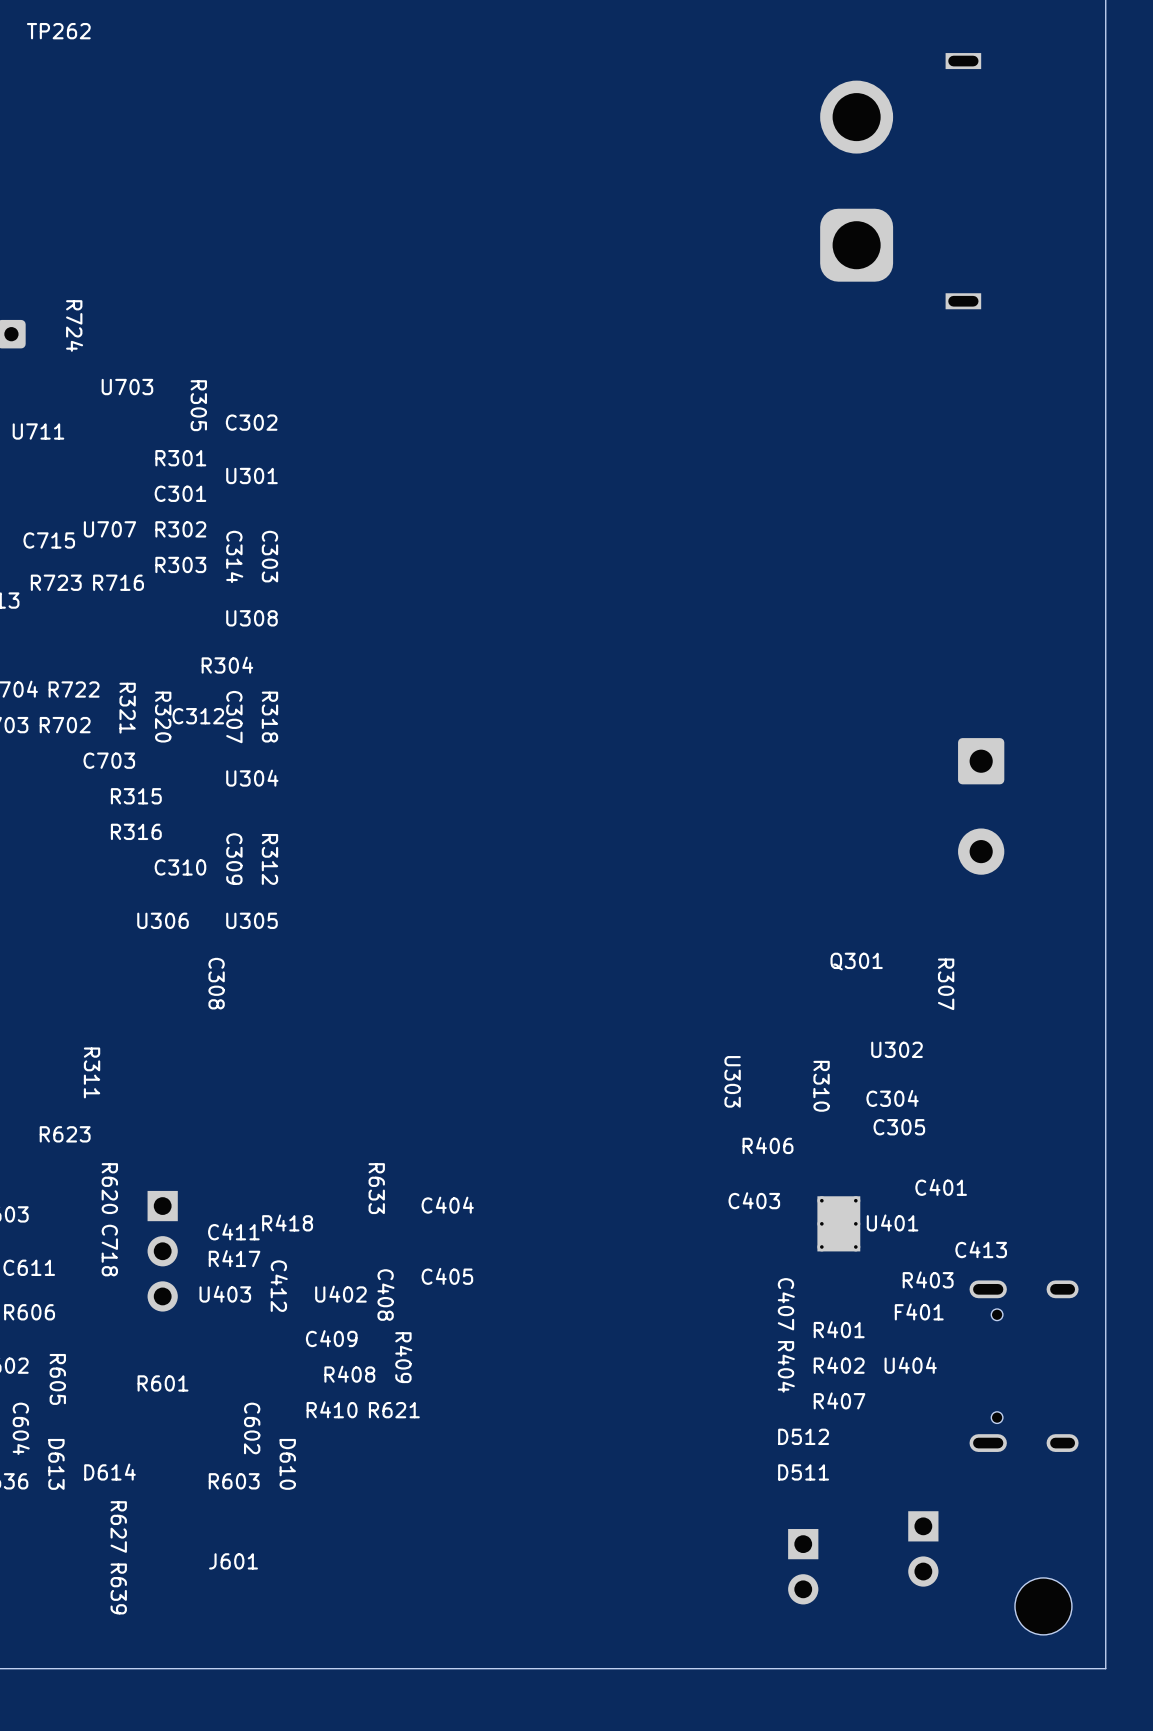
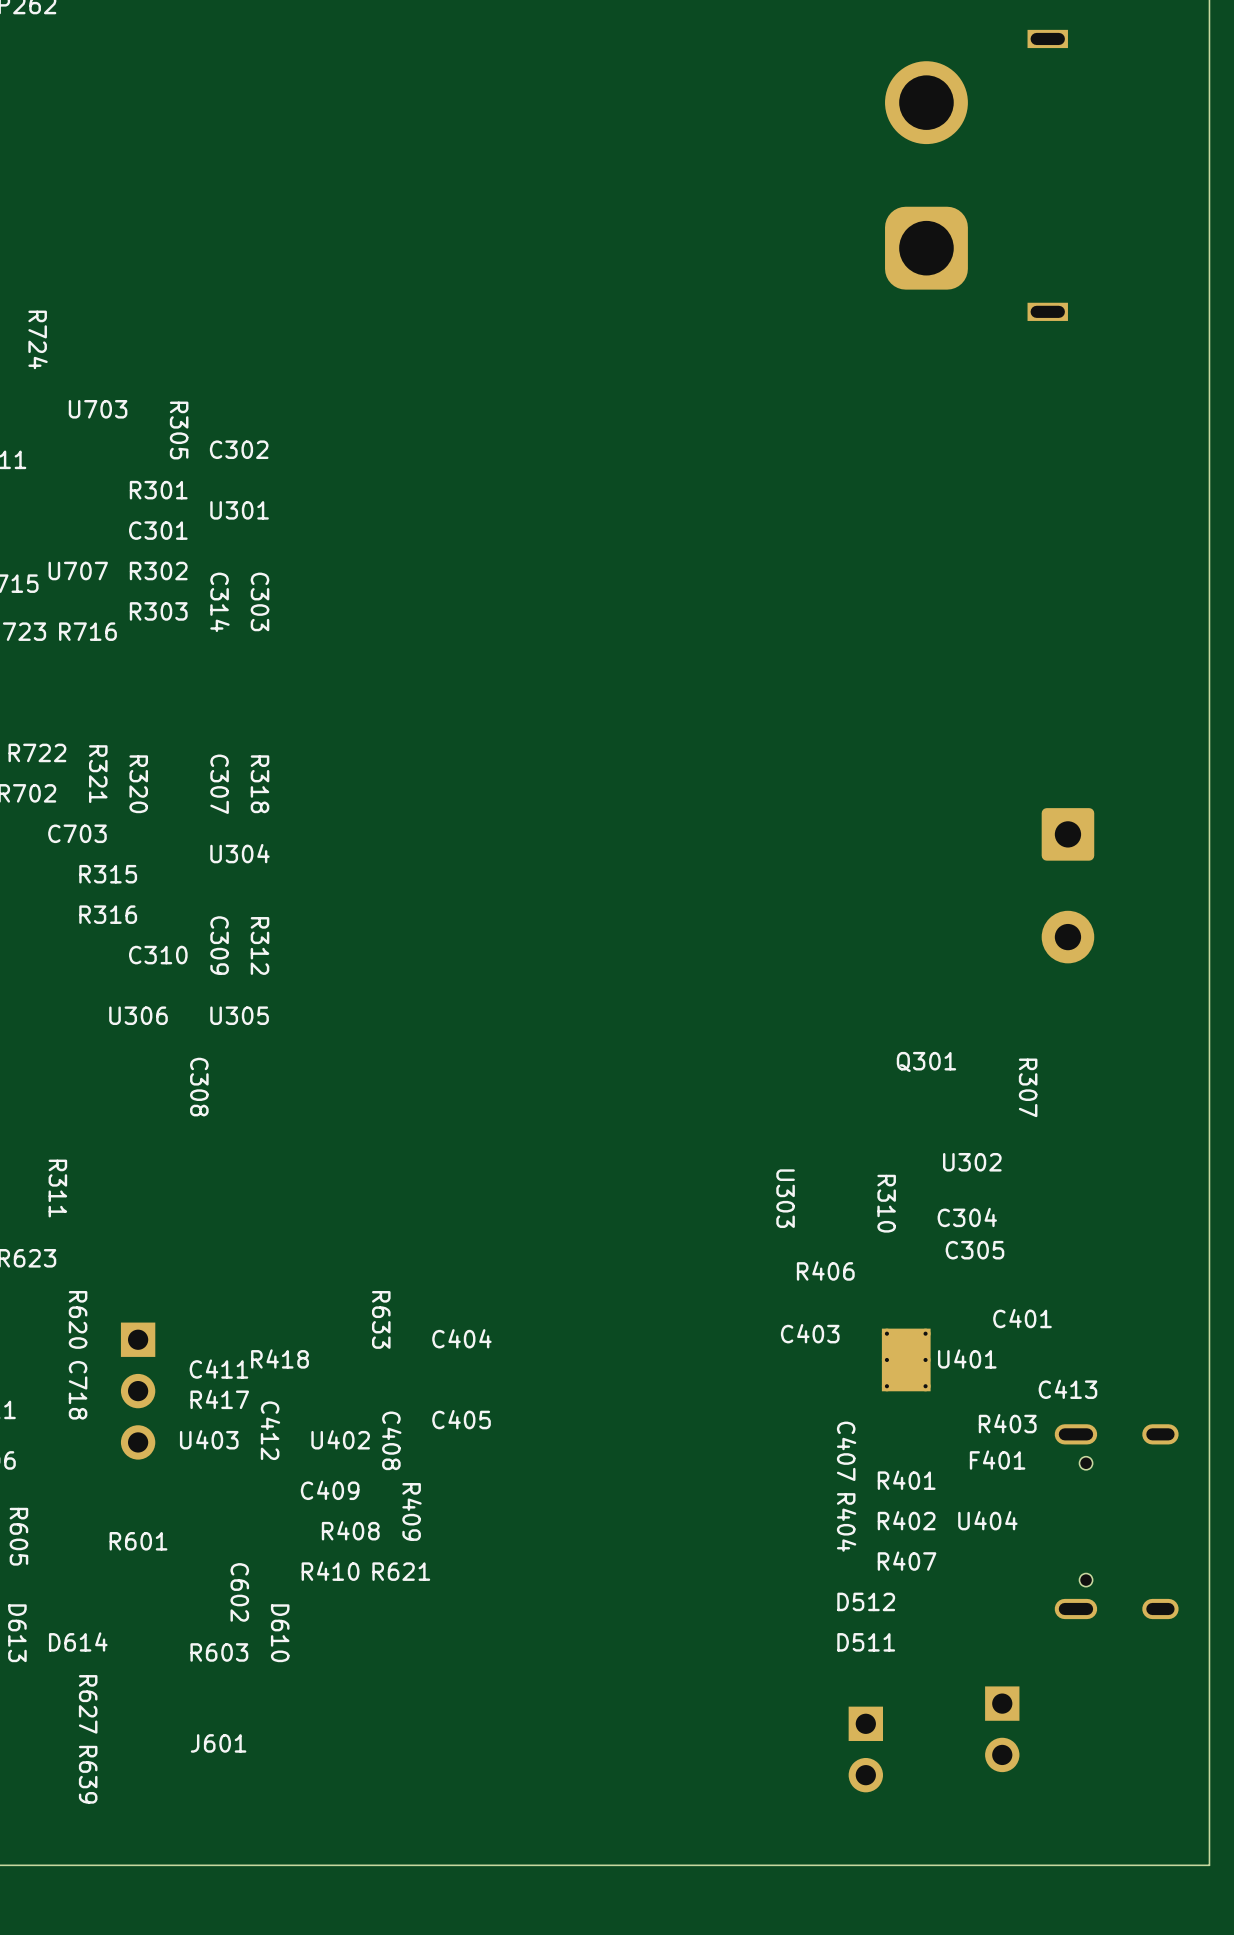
U308: (251, 618) -> none
R304: (227, 665) -> none
C312: (198, 716) -> none
part: (1043, 1606) -> none

